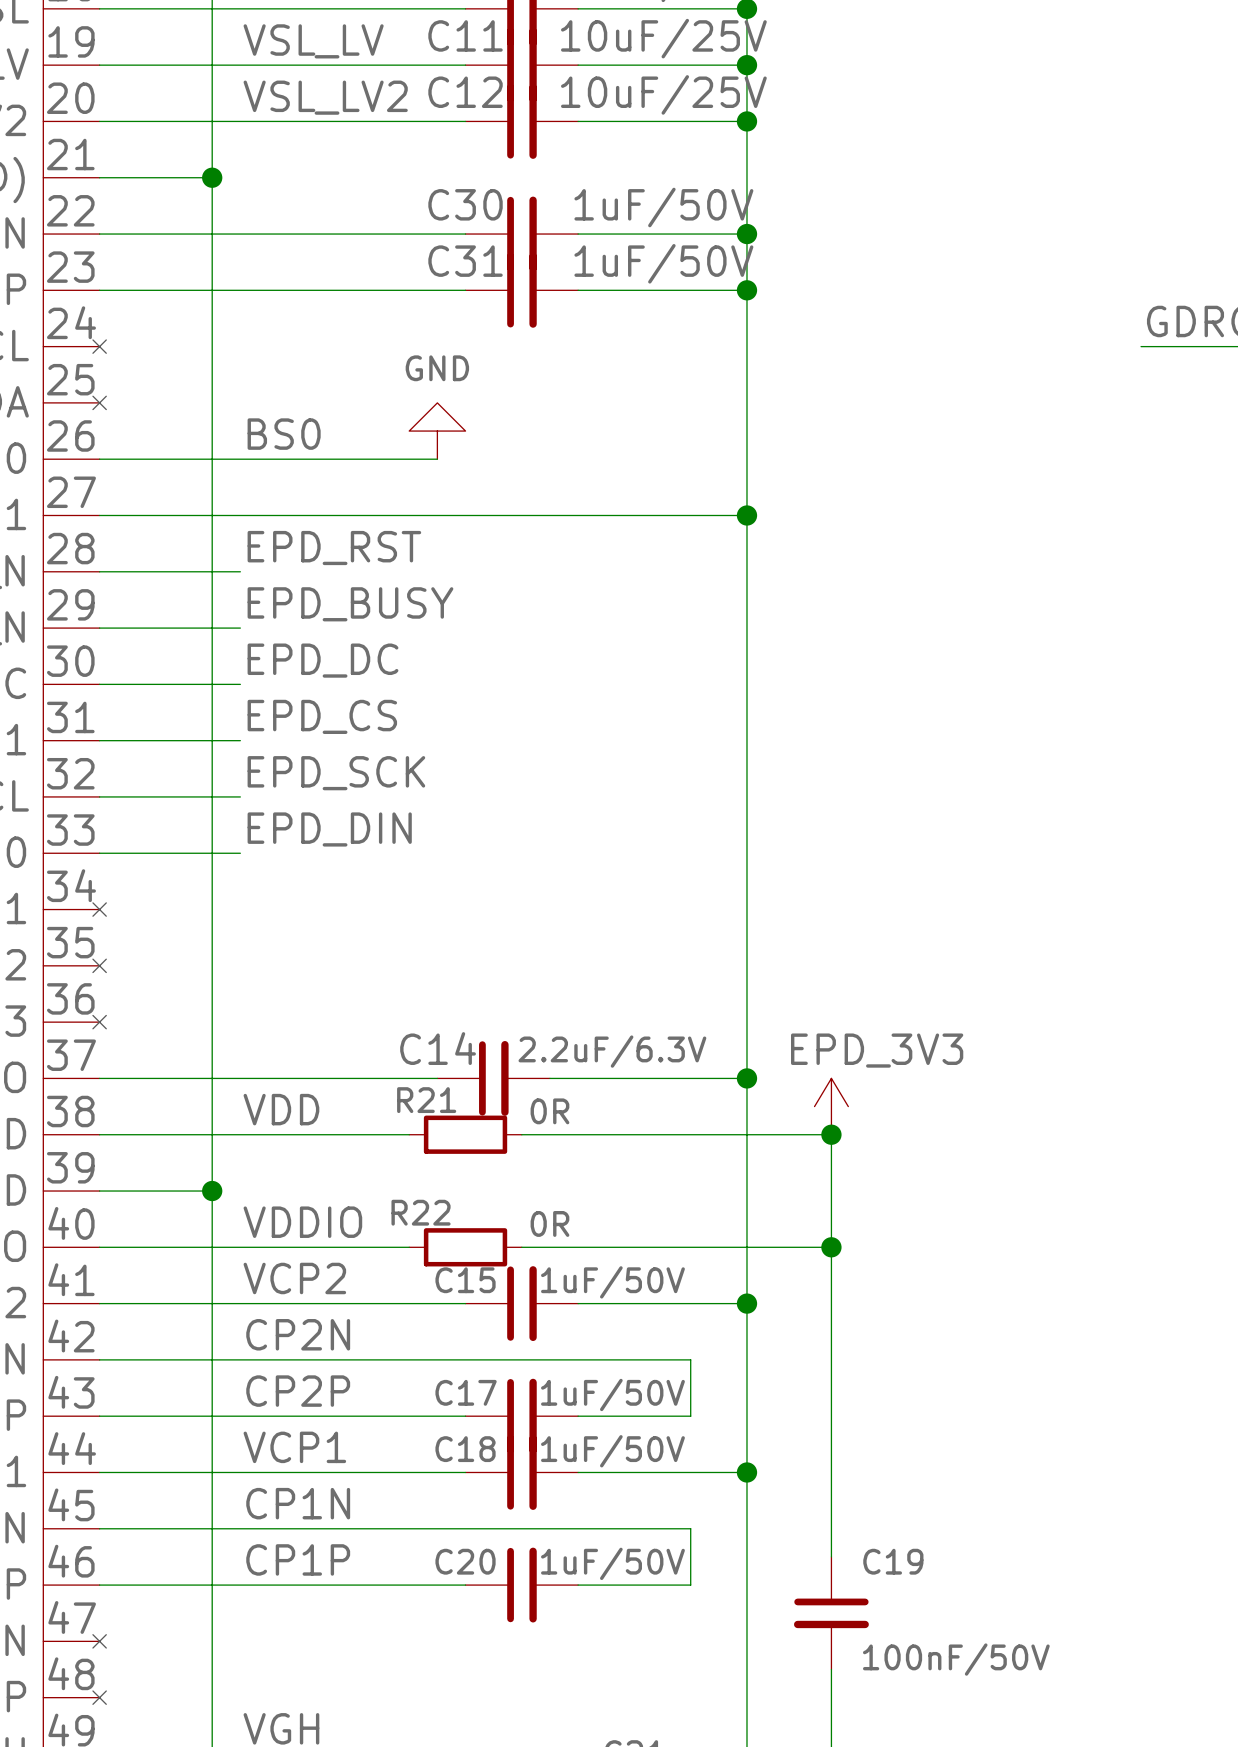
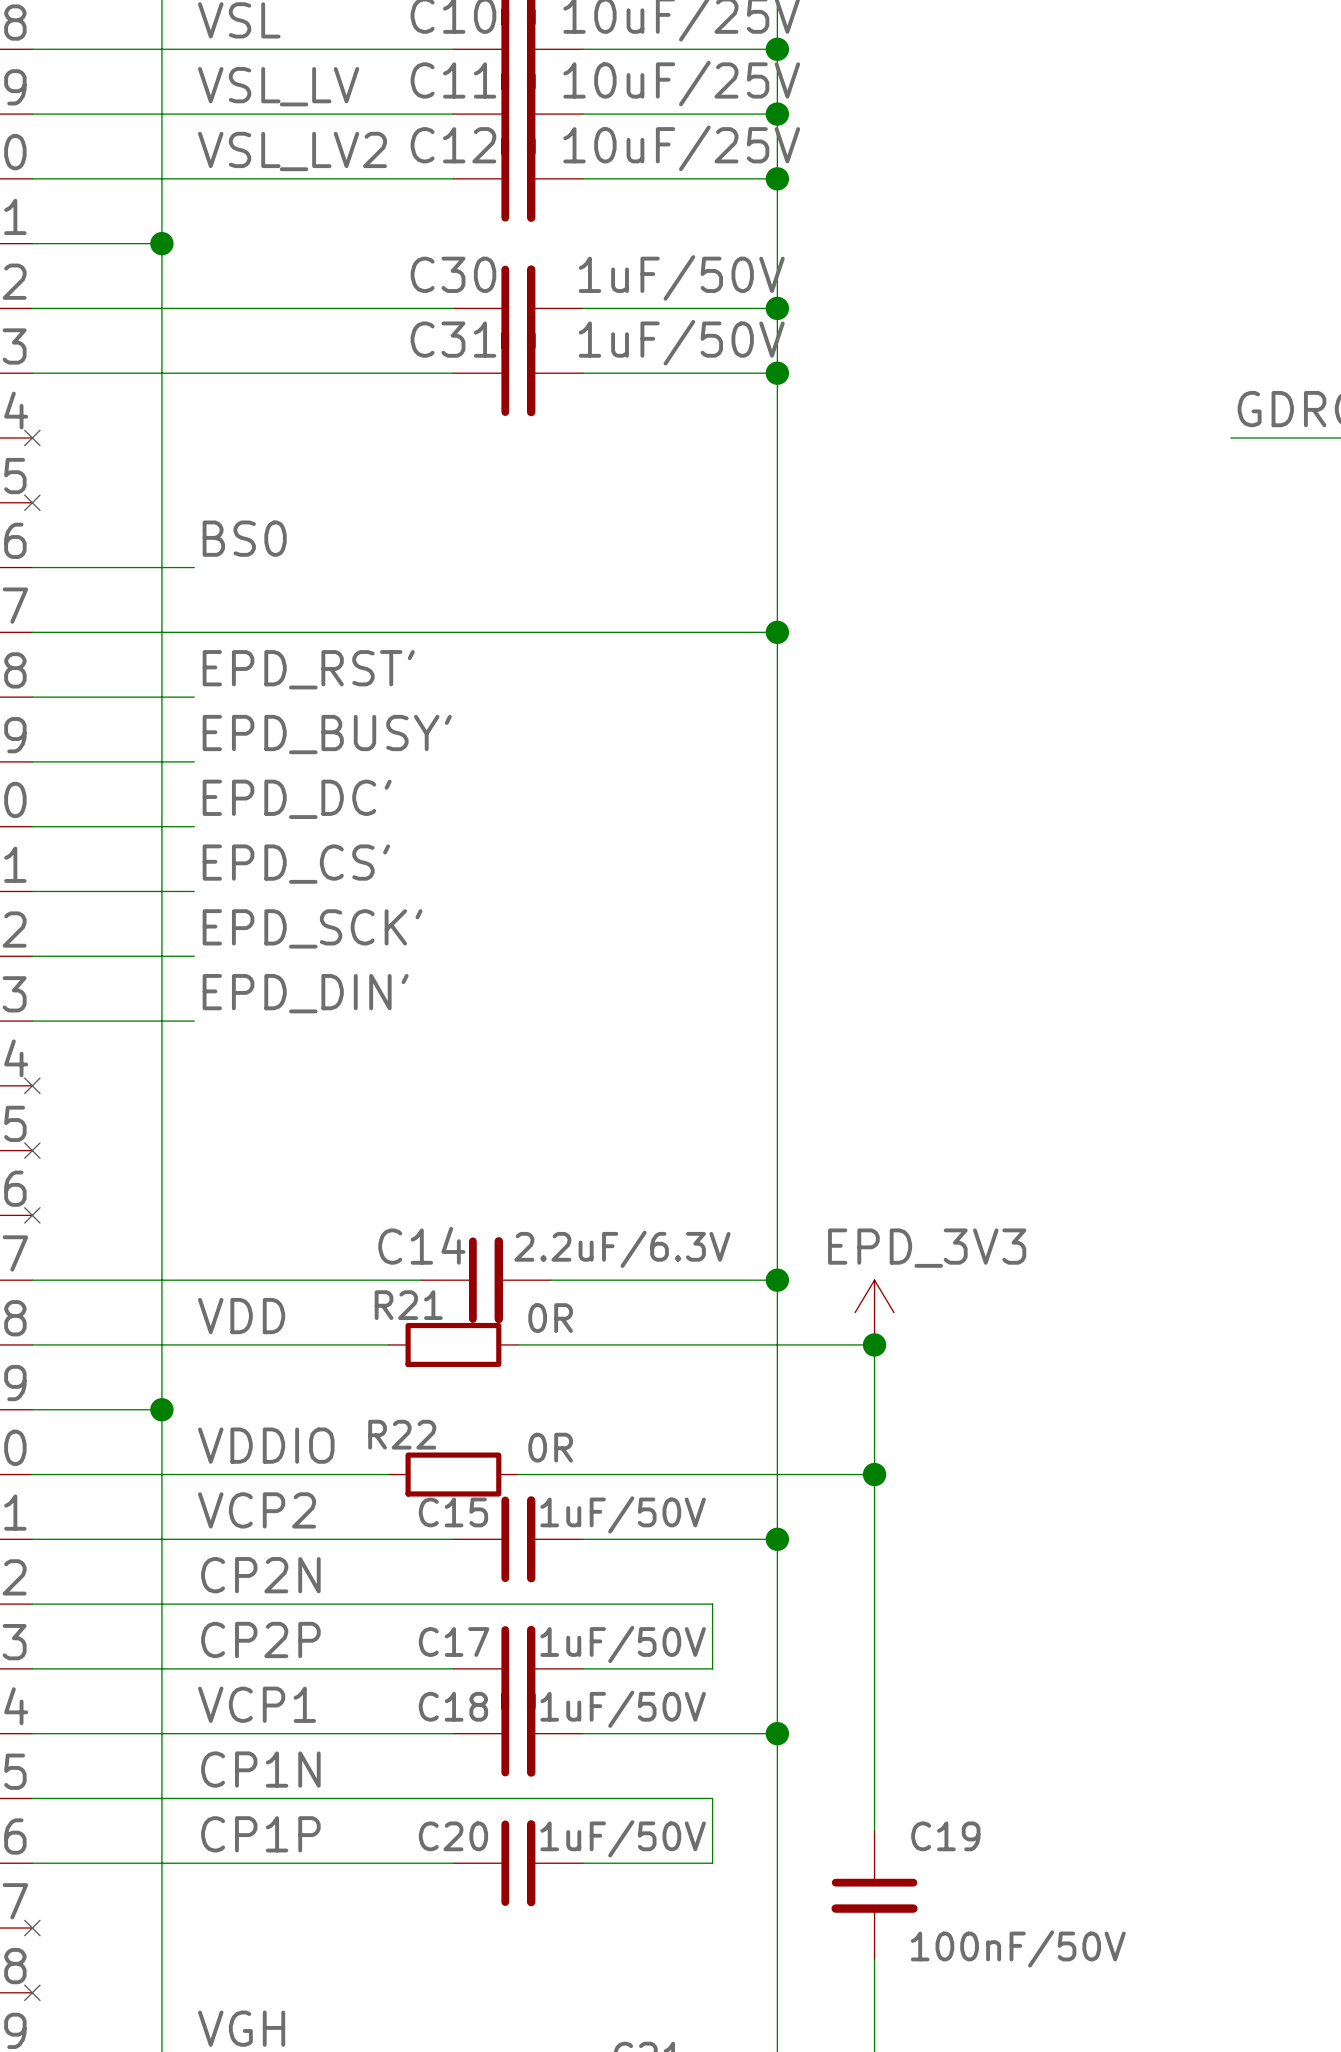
power symbol: GND (437, 431) -> none
wire: (240, 459) (437, 459) -> none
label: EPD_RST (334, 548) -> EPD_RST' (308, 669)
label: EPD_BUSY (350, 604) -> EPD_BUSY' (327, 734)
label: EPD_DC (322, 660) -> EPD_DC' (297, 799)
label: EPD_CS (322, 716) -> EPD_CS' (296, 864)
label: EPD_SCK (336, 773) -> EPD_SCK' (312, 928)
label: EPD_DIN (329, 829) -> EPD_DIN' (305, 993)

